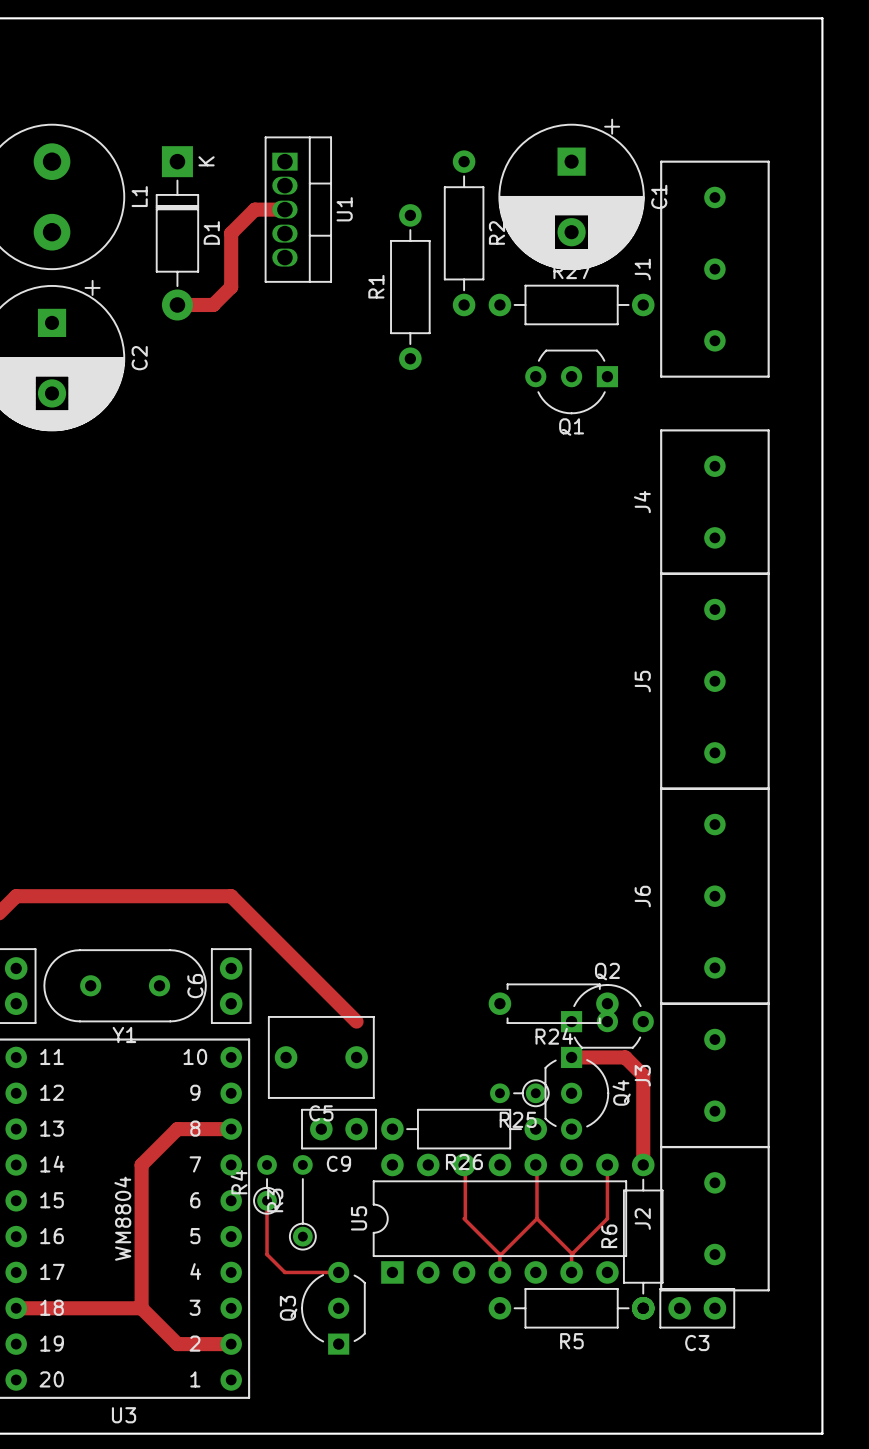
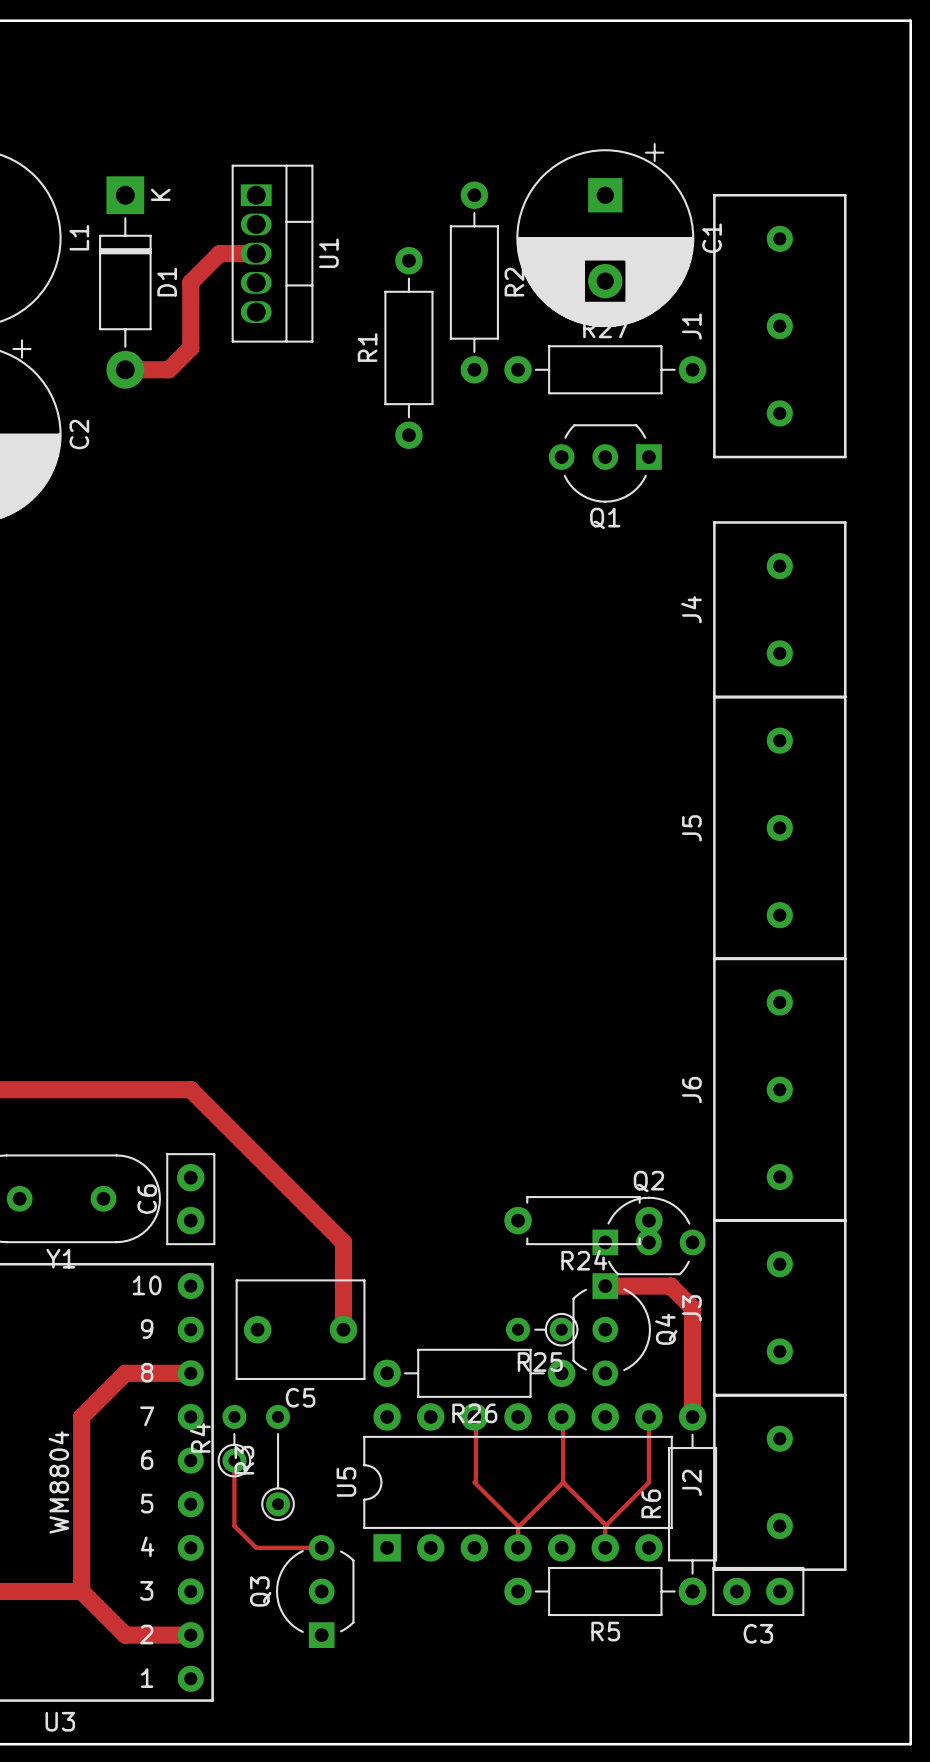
track: none -> (343, 1242) (343, 1329)
C5 position: (321, 1057) -> (300, 1329)
C9: (338, 1129) -> none

